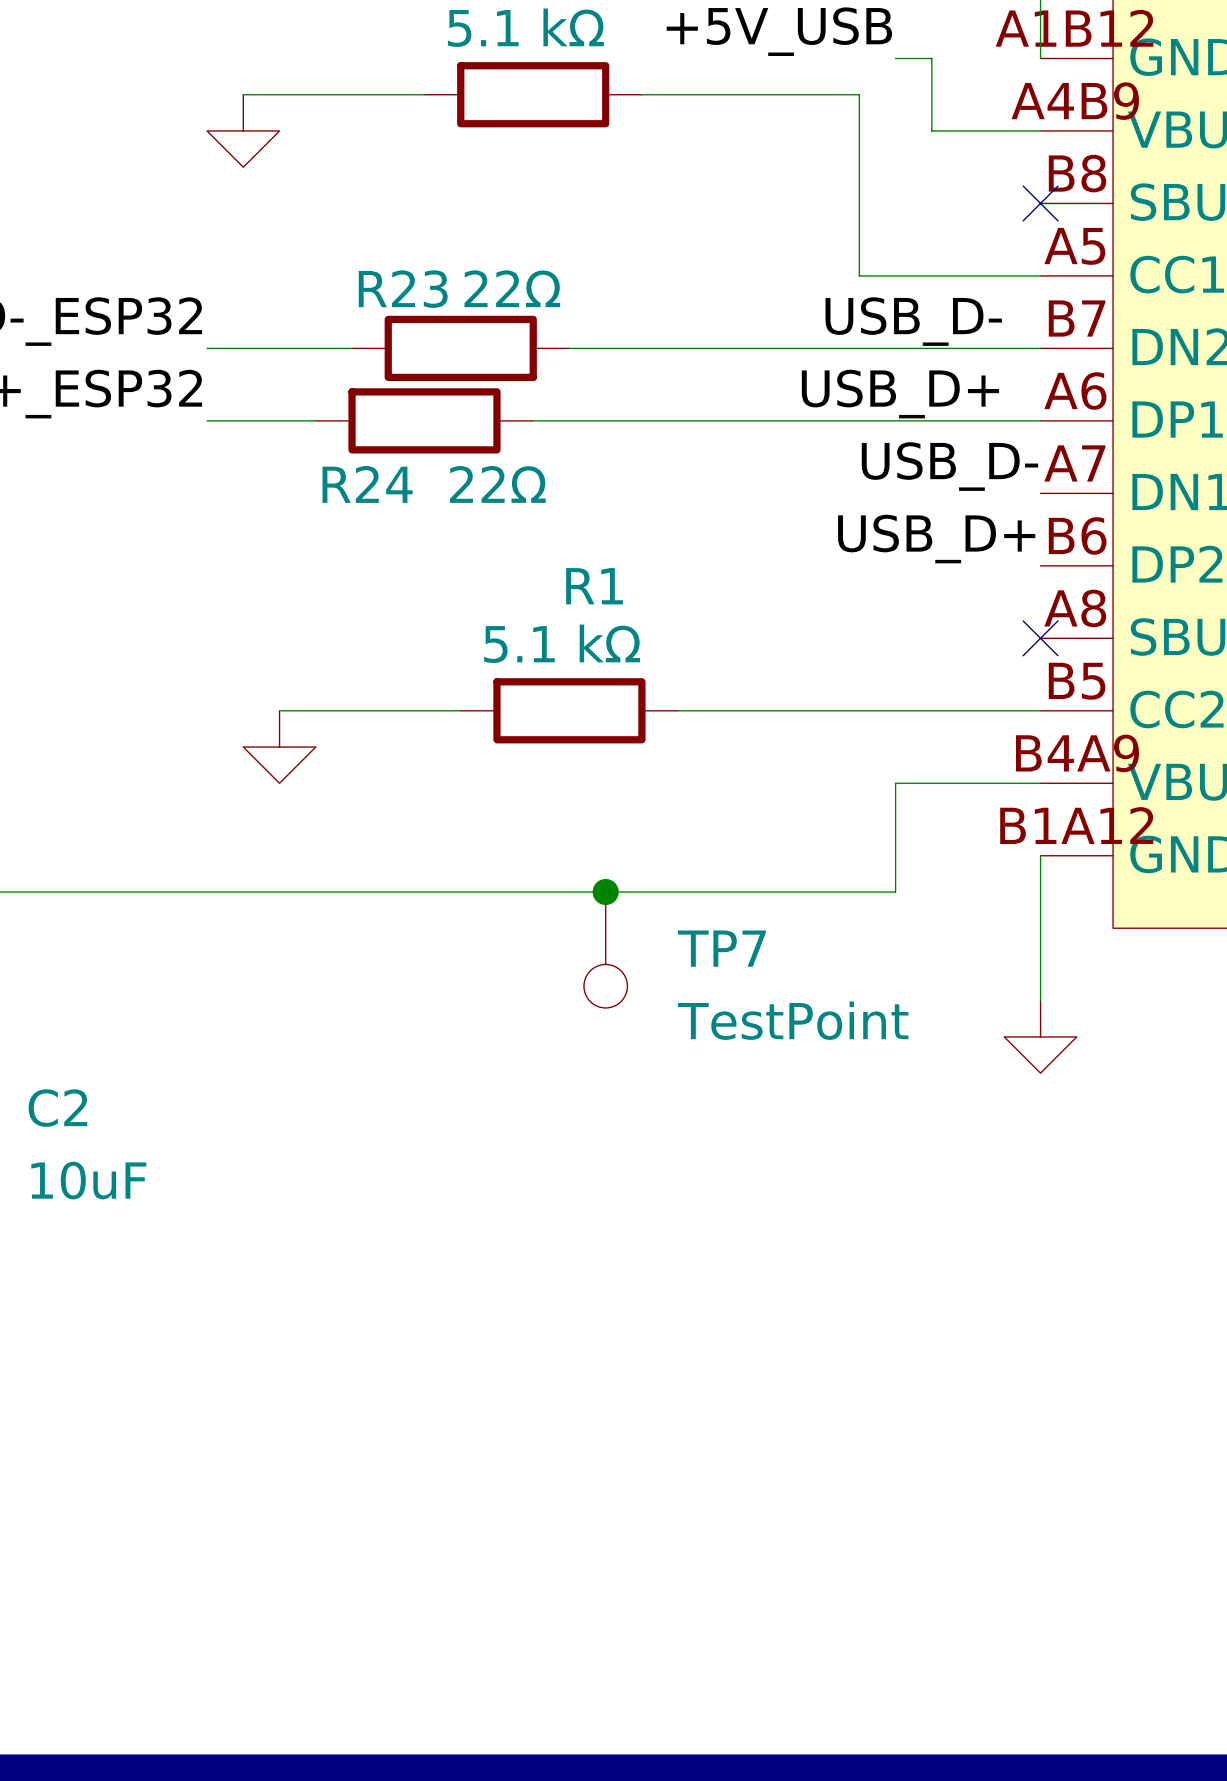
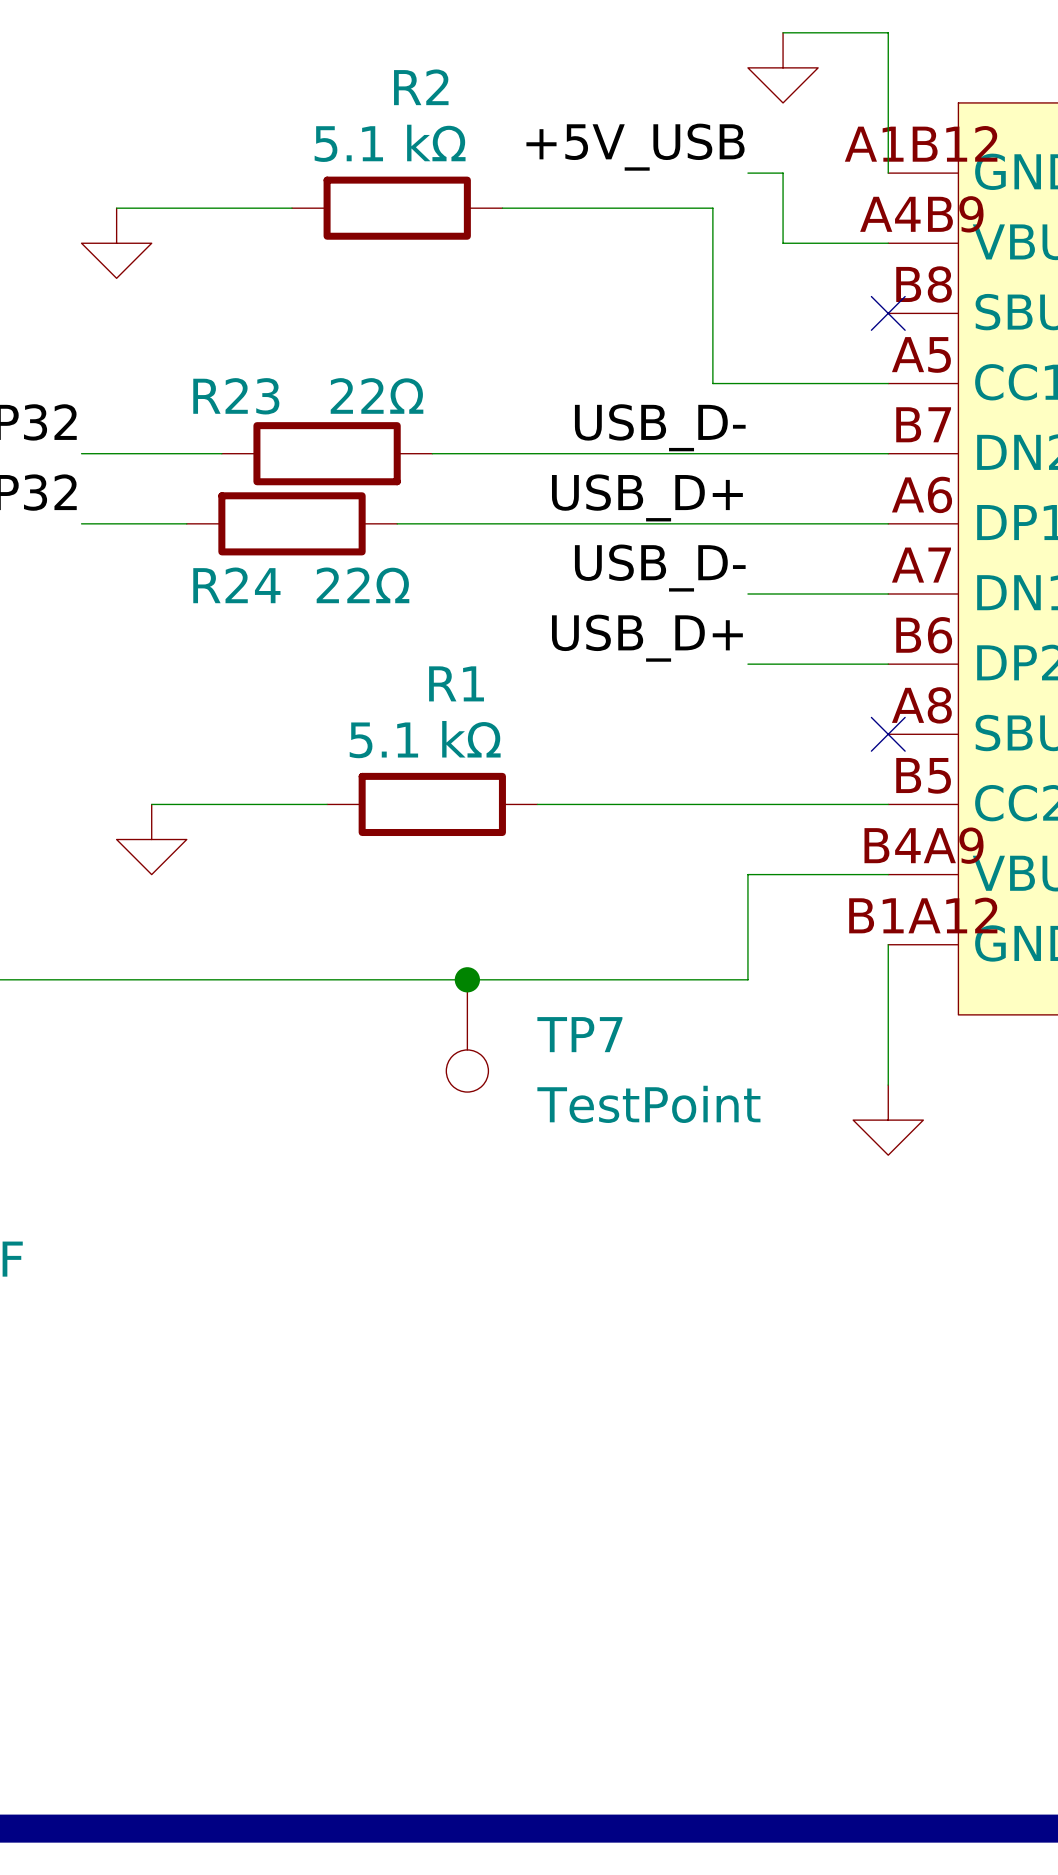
R23 name position: R23 (403, 289) -> R23 (236, 396)
label: none -> USB_D- (660, 427)
label: USB_D- (913, 321) -> none
label: none -> USB_D+ (647, 497)
label: USB_D+ (900, 394) -> none
label: none -> USB_D- (660, 568)
label: USB_D- (949, 466) -> none
wire: none -> (747, 593) (888, 593)
label: none -> USB_D+ (647, 638)
label: USB_D+ (936, 539) -> none
wire: none -> (747, 664) (888, 664)

